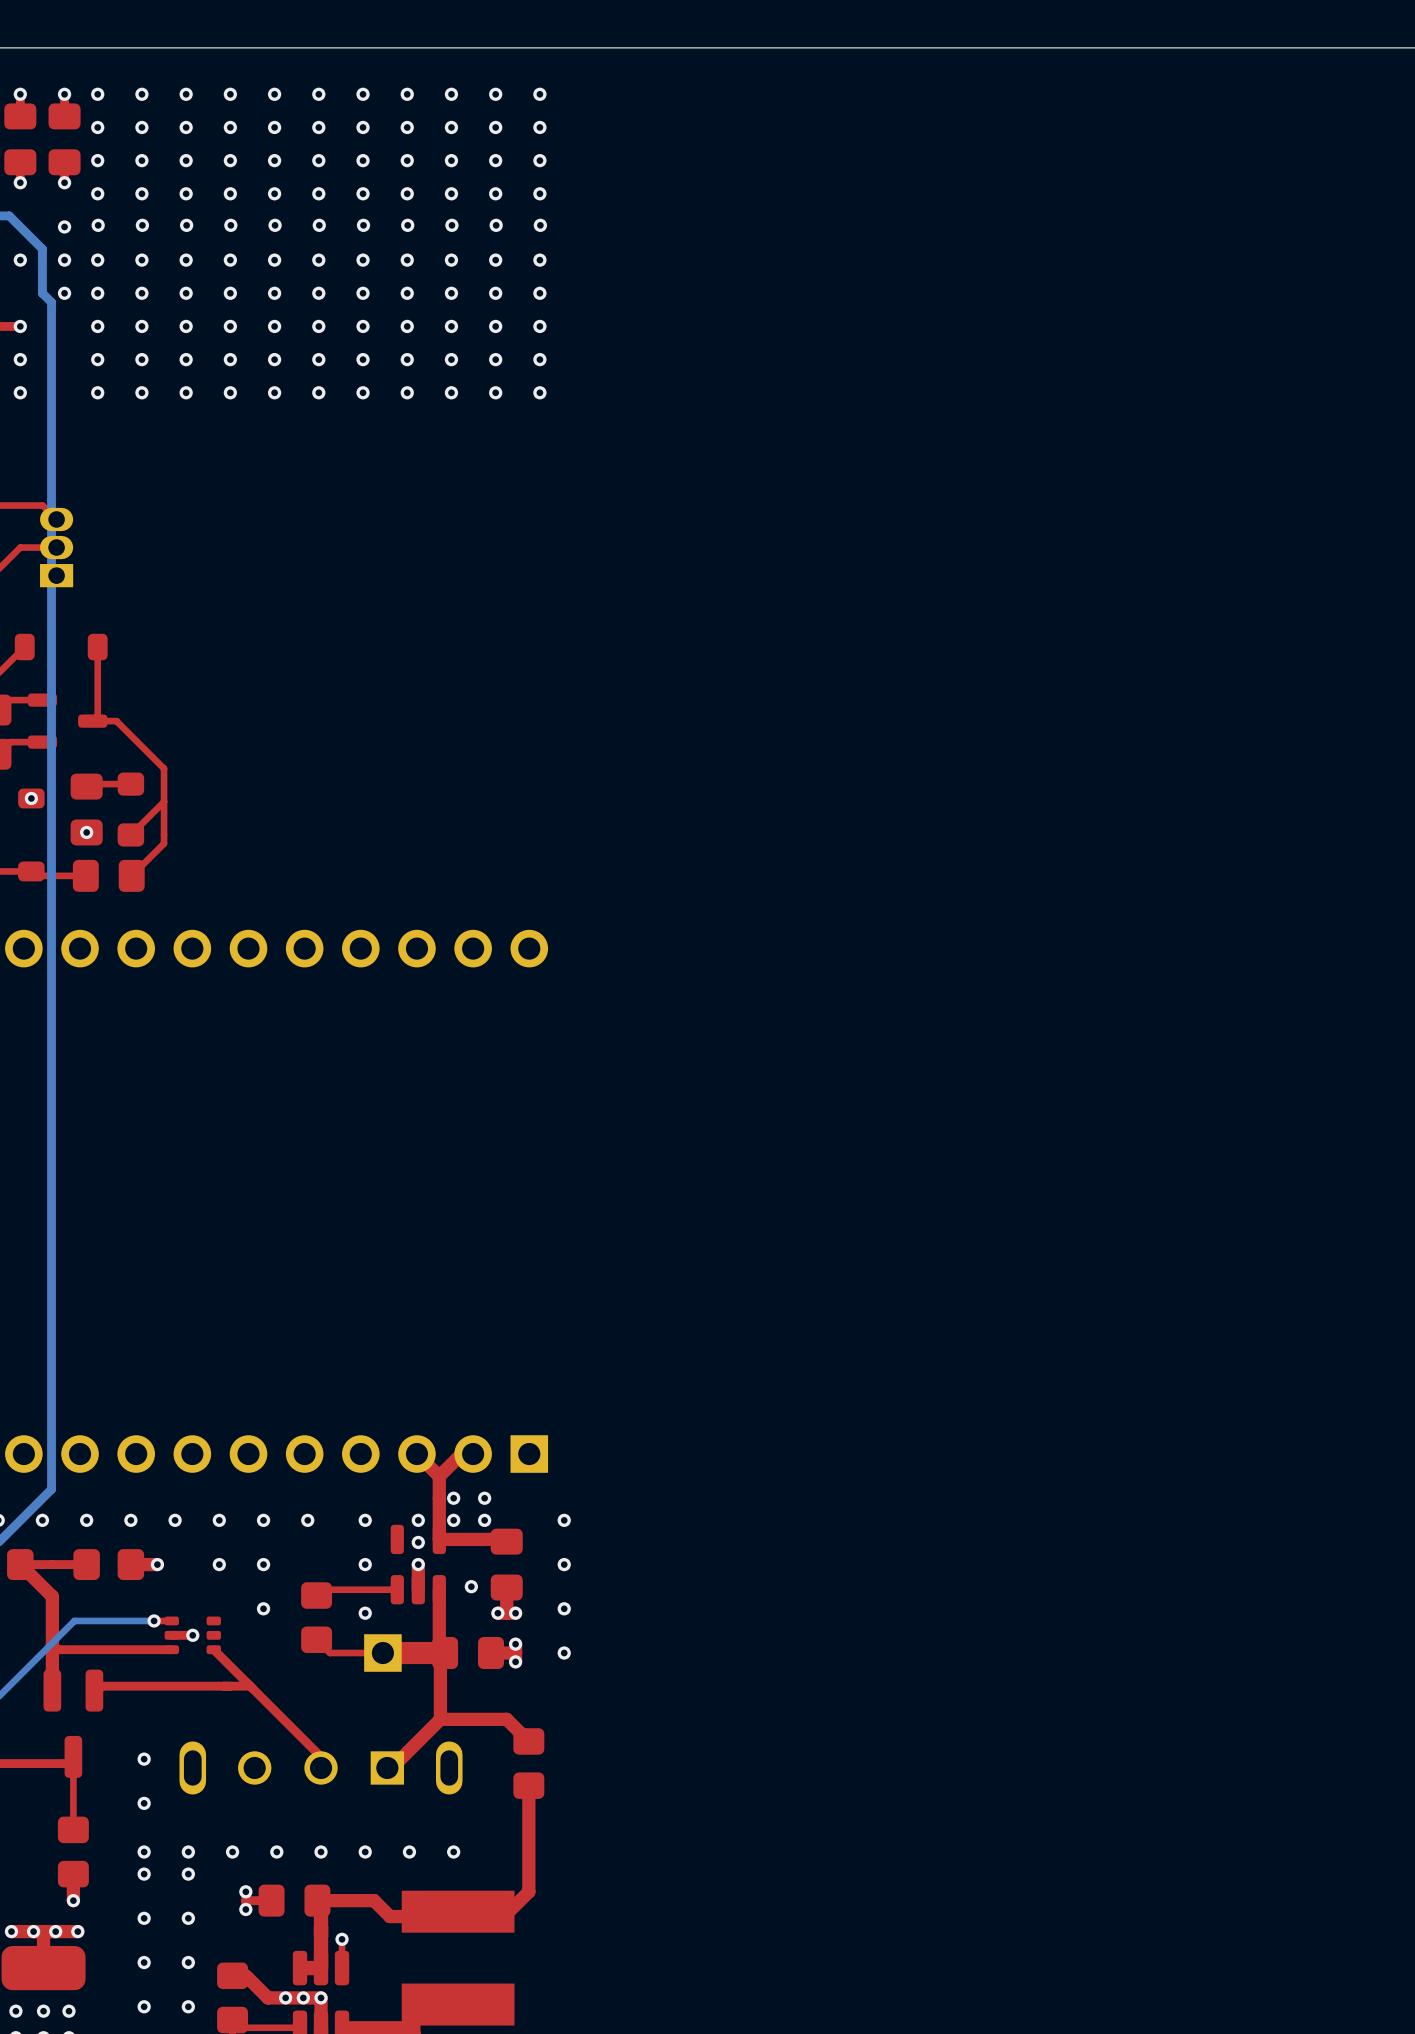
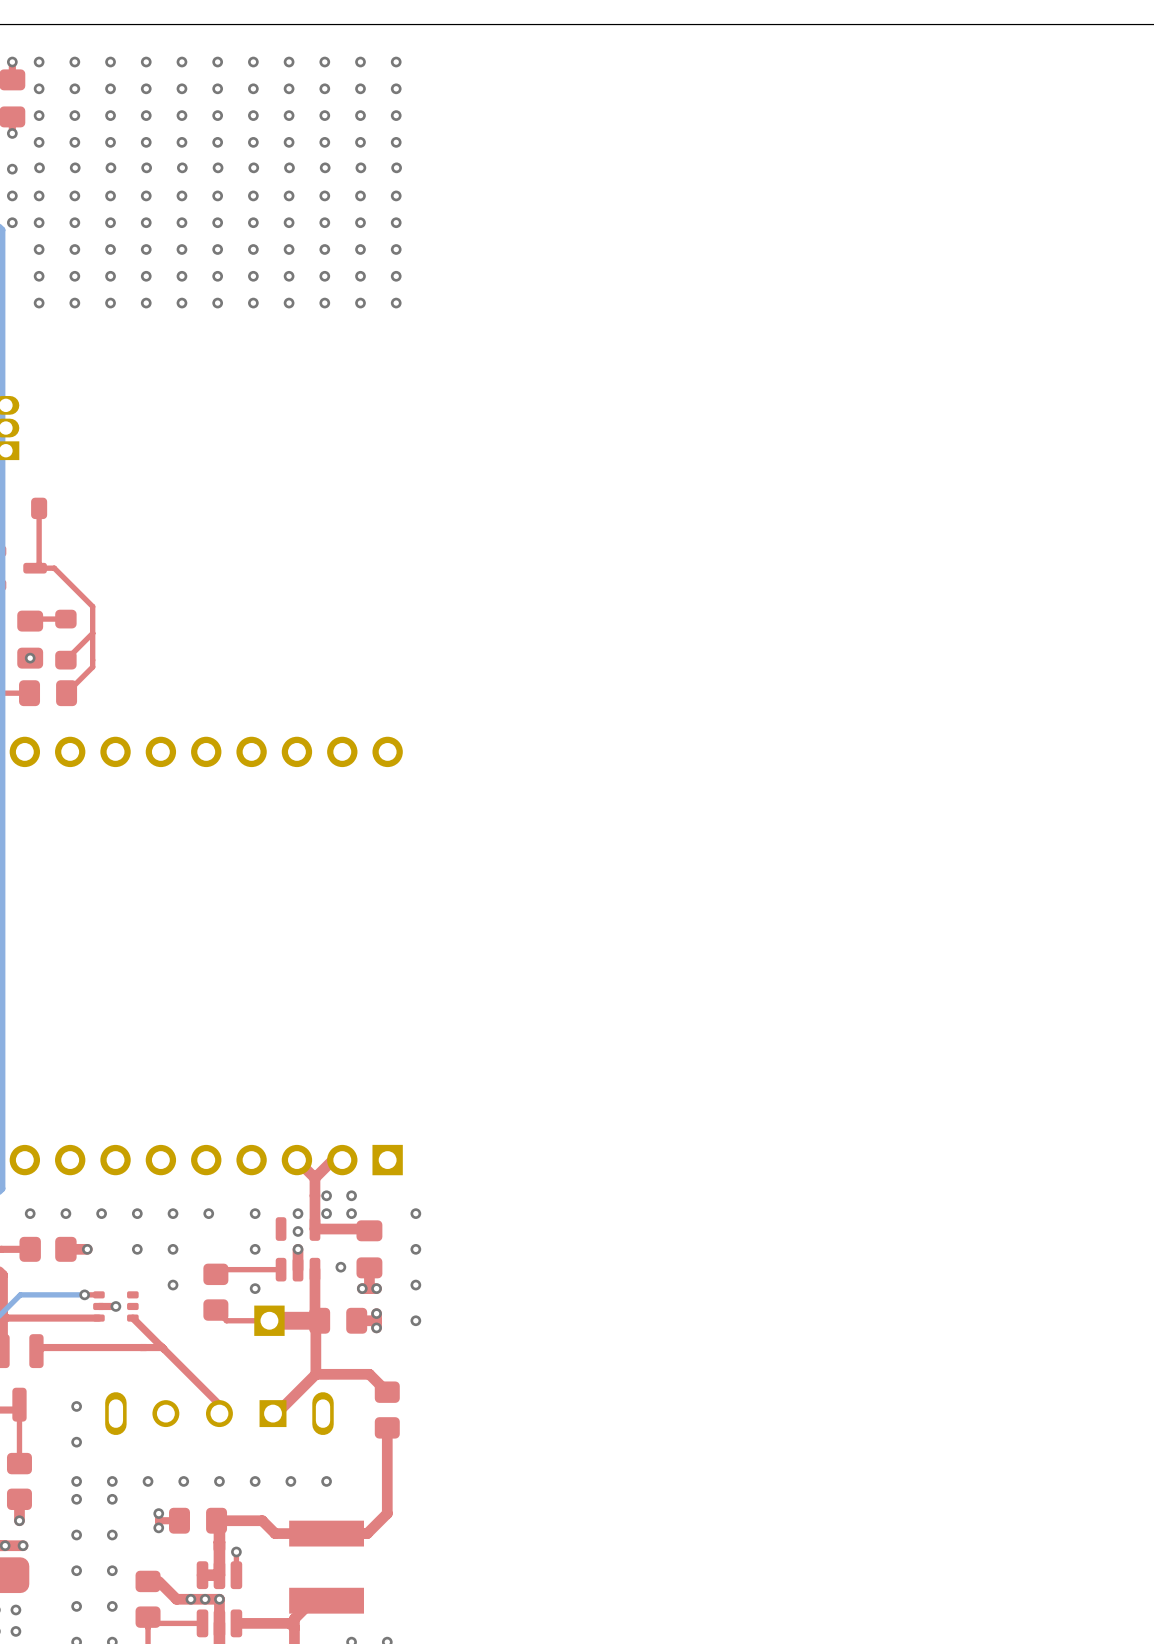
part footprint: [401, 1890, 515, 2026] -> [289, 1520, 364, 1614]

